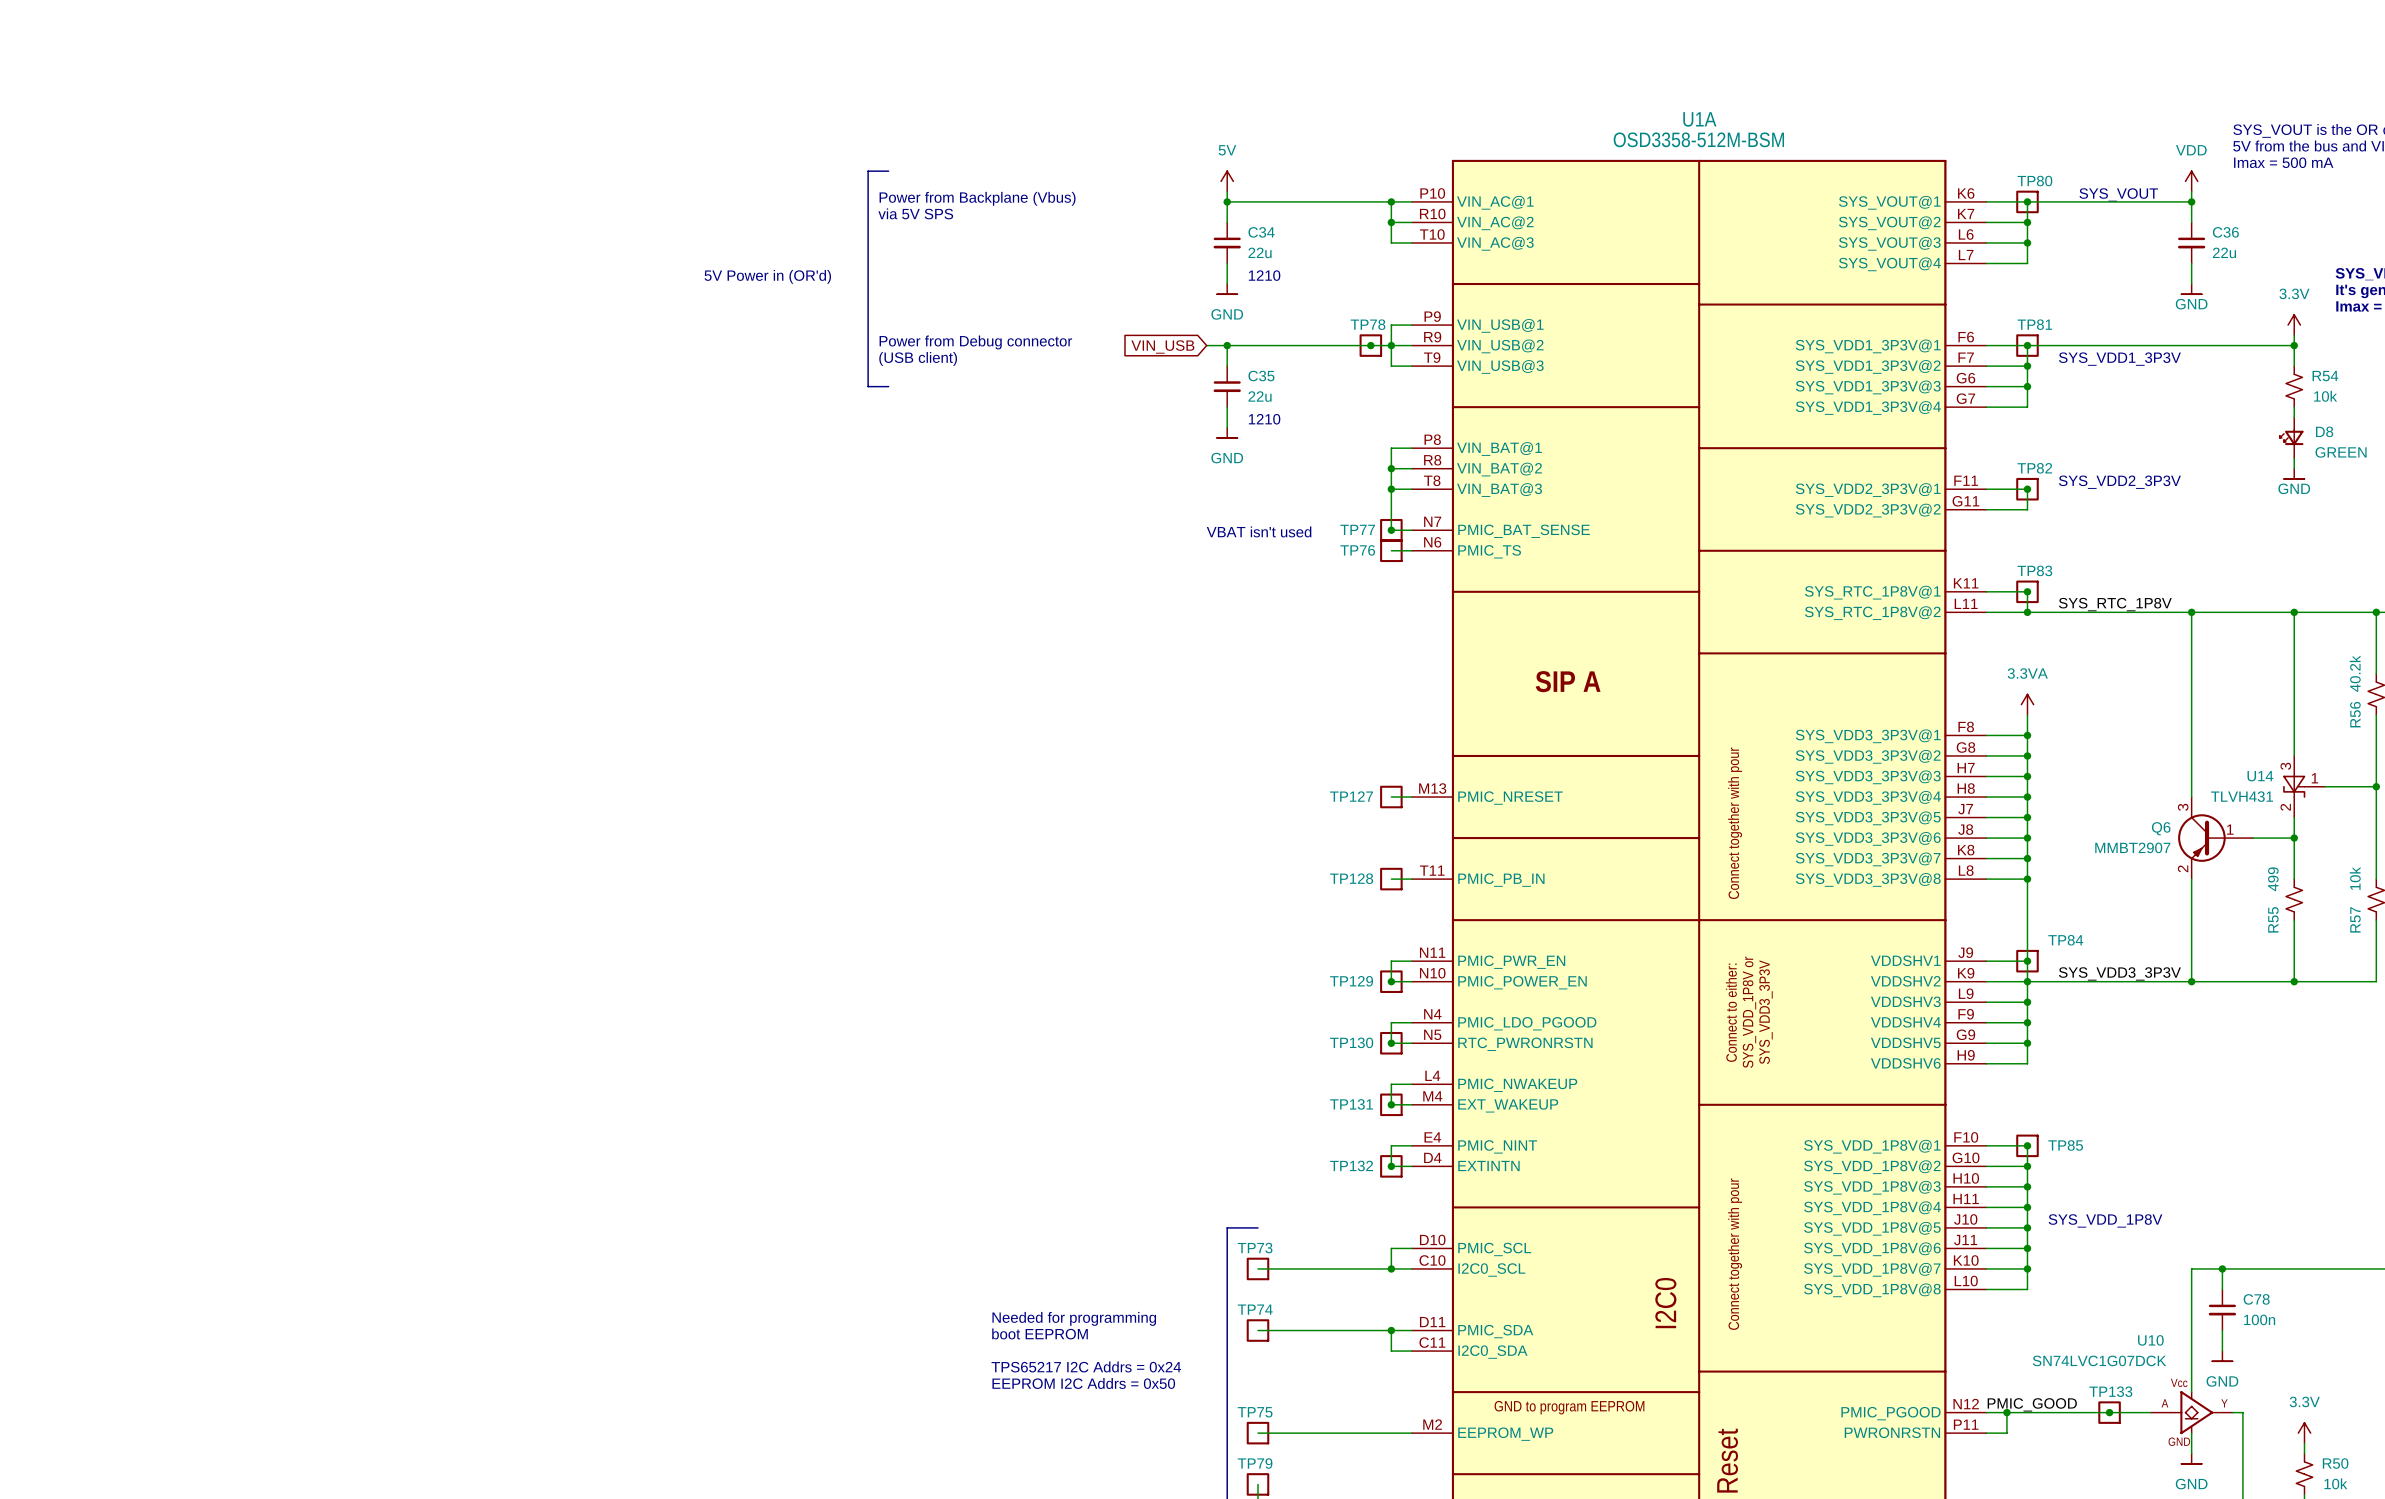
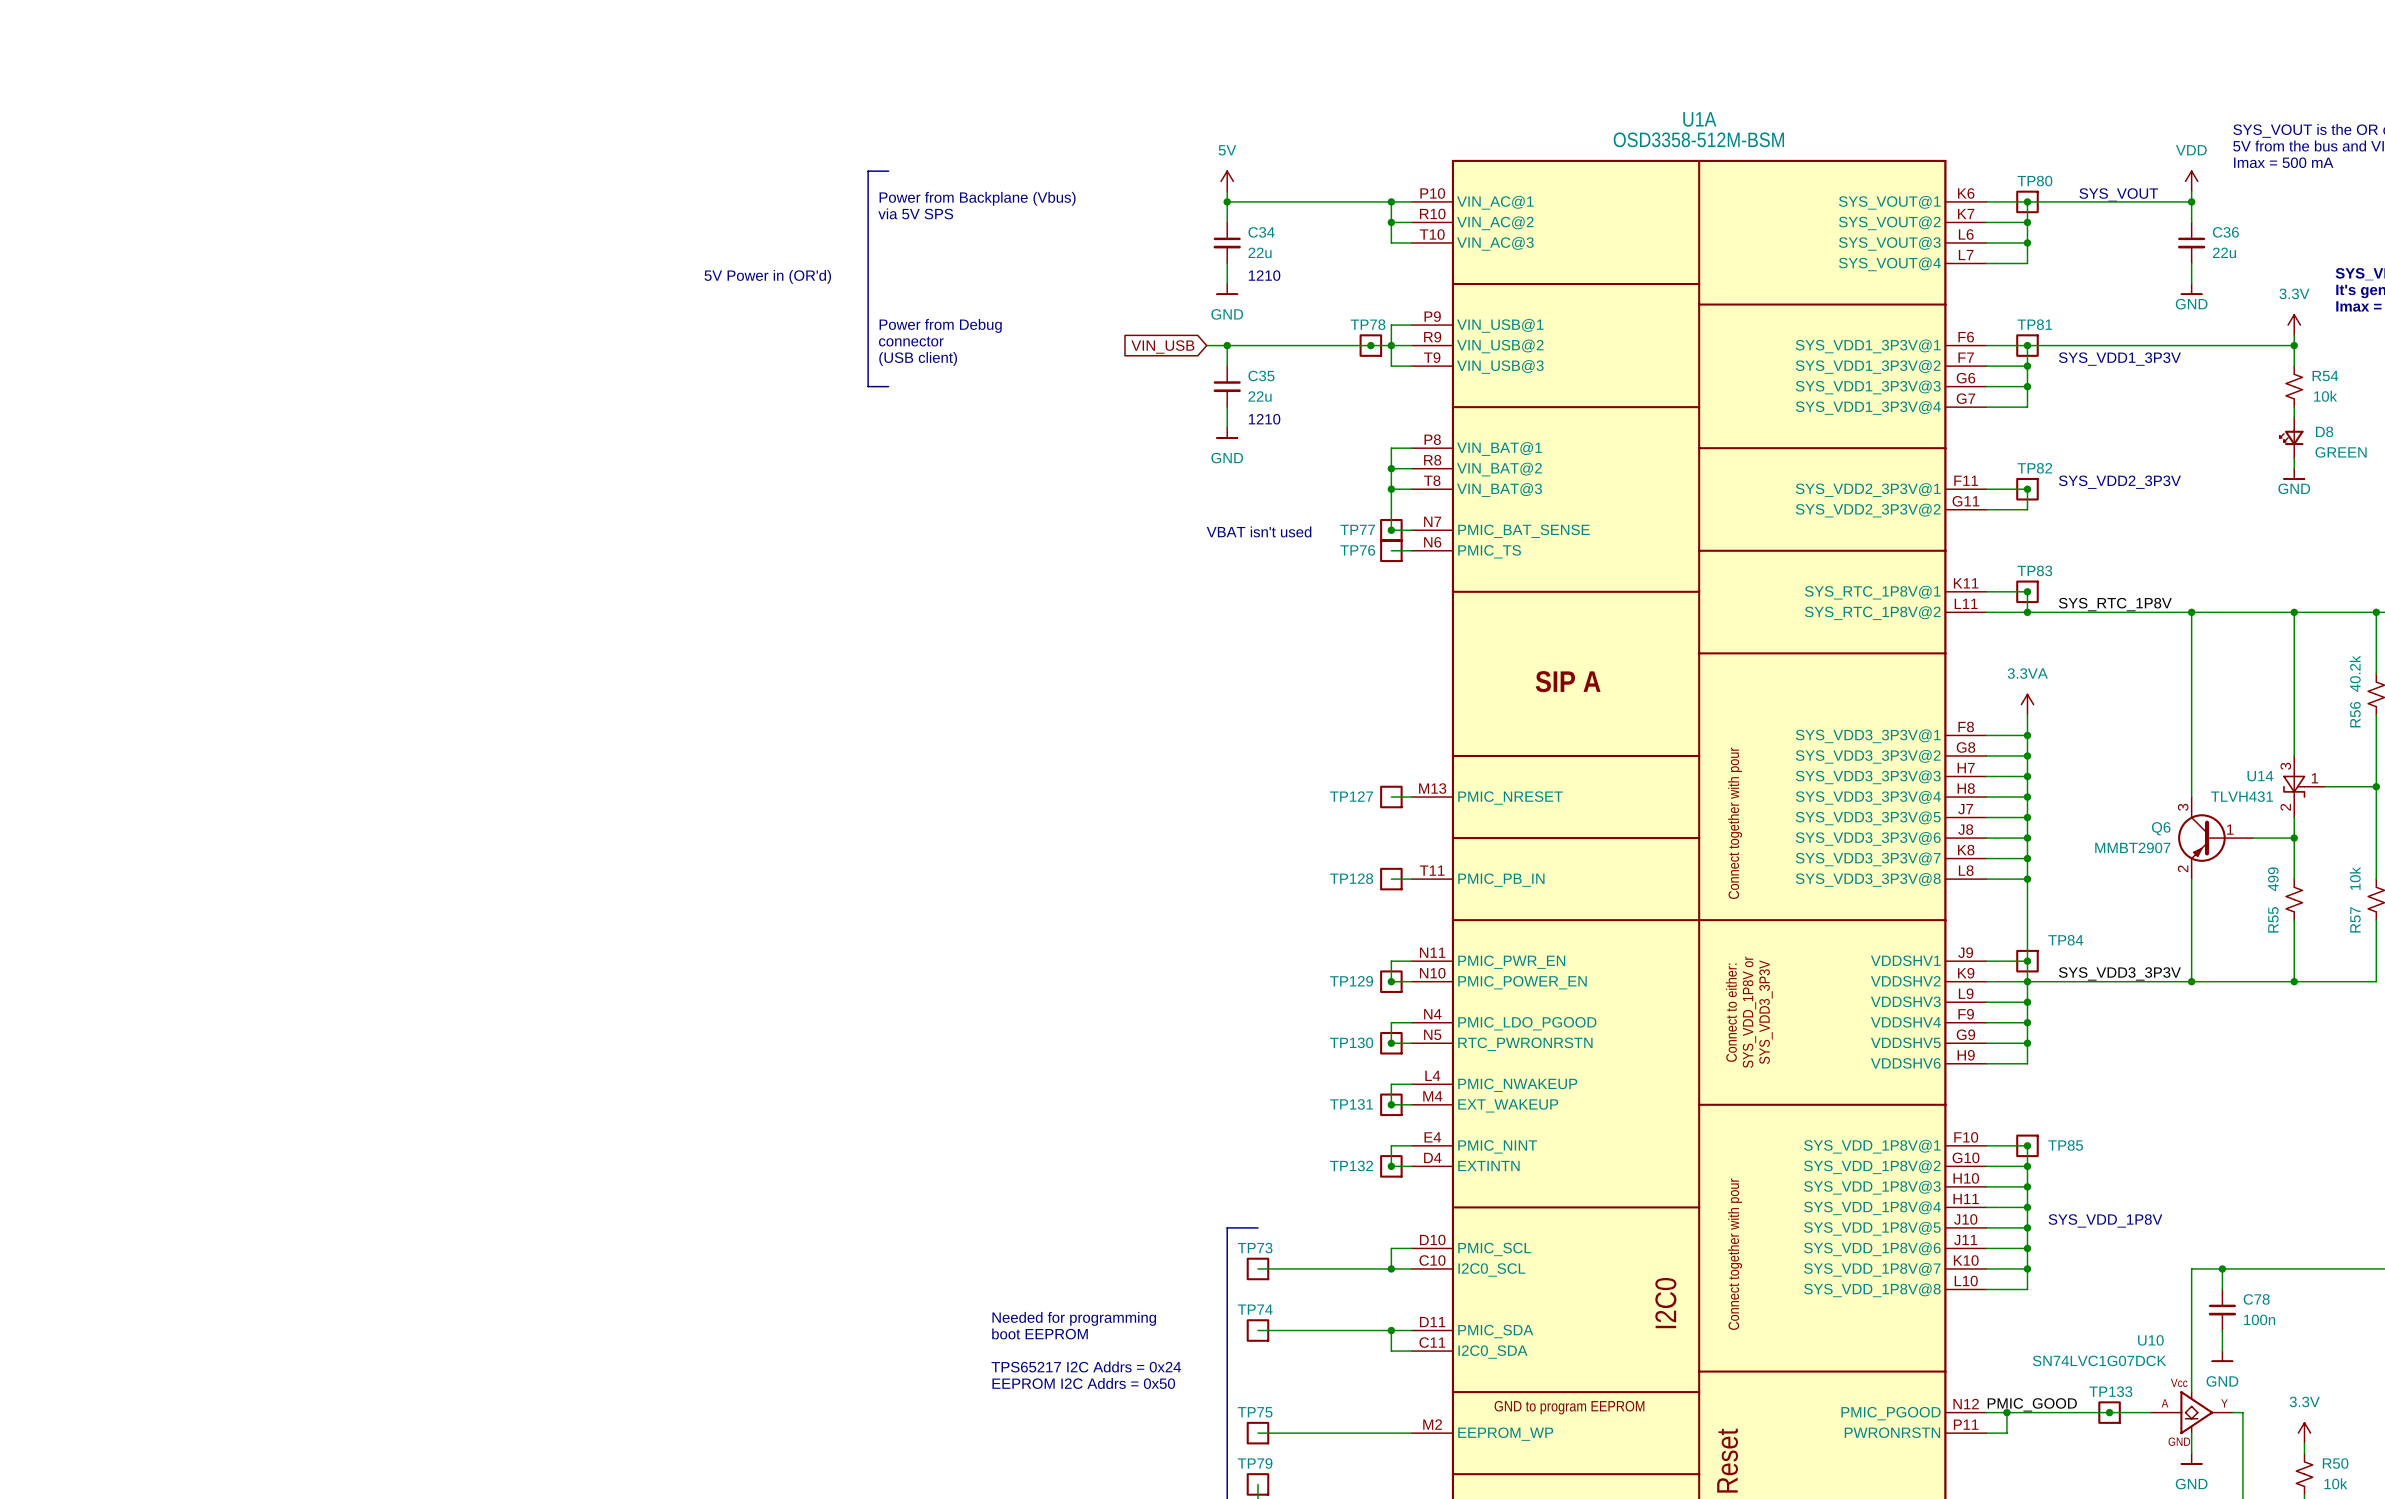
text: none -> Power from Debug (940, 325)
text: Power from Debug connector (975, 342) -> connector (911, 341)

